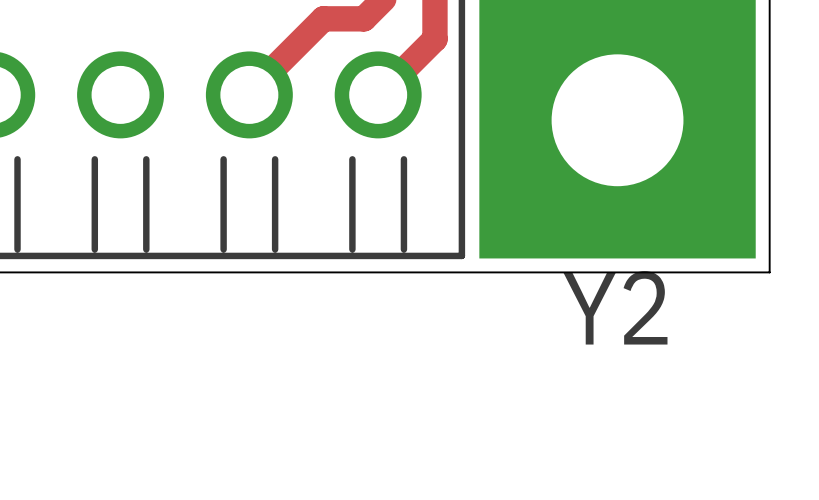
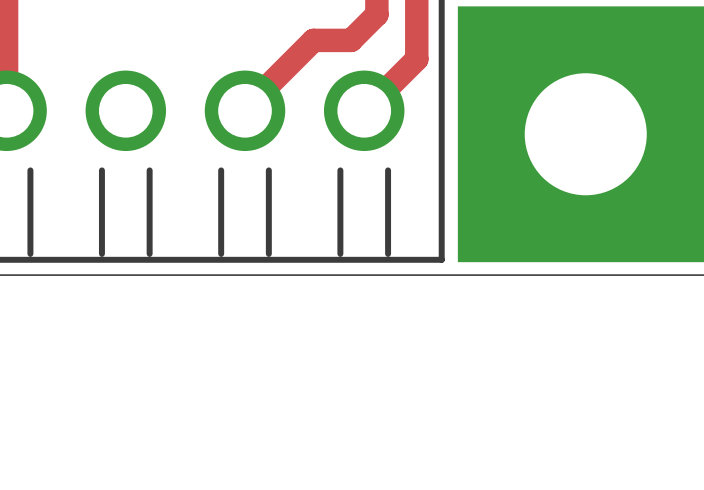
Y2 name: Y2 (615, 307) -> none

